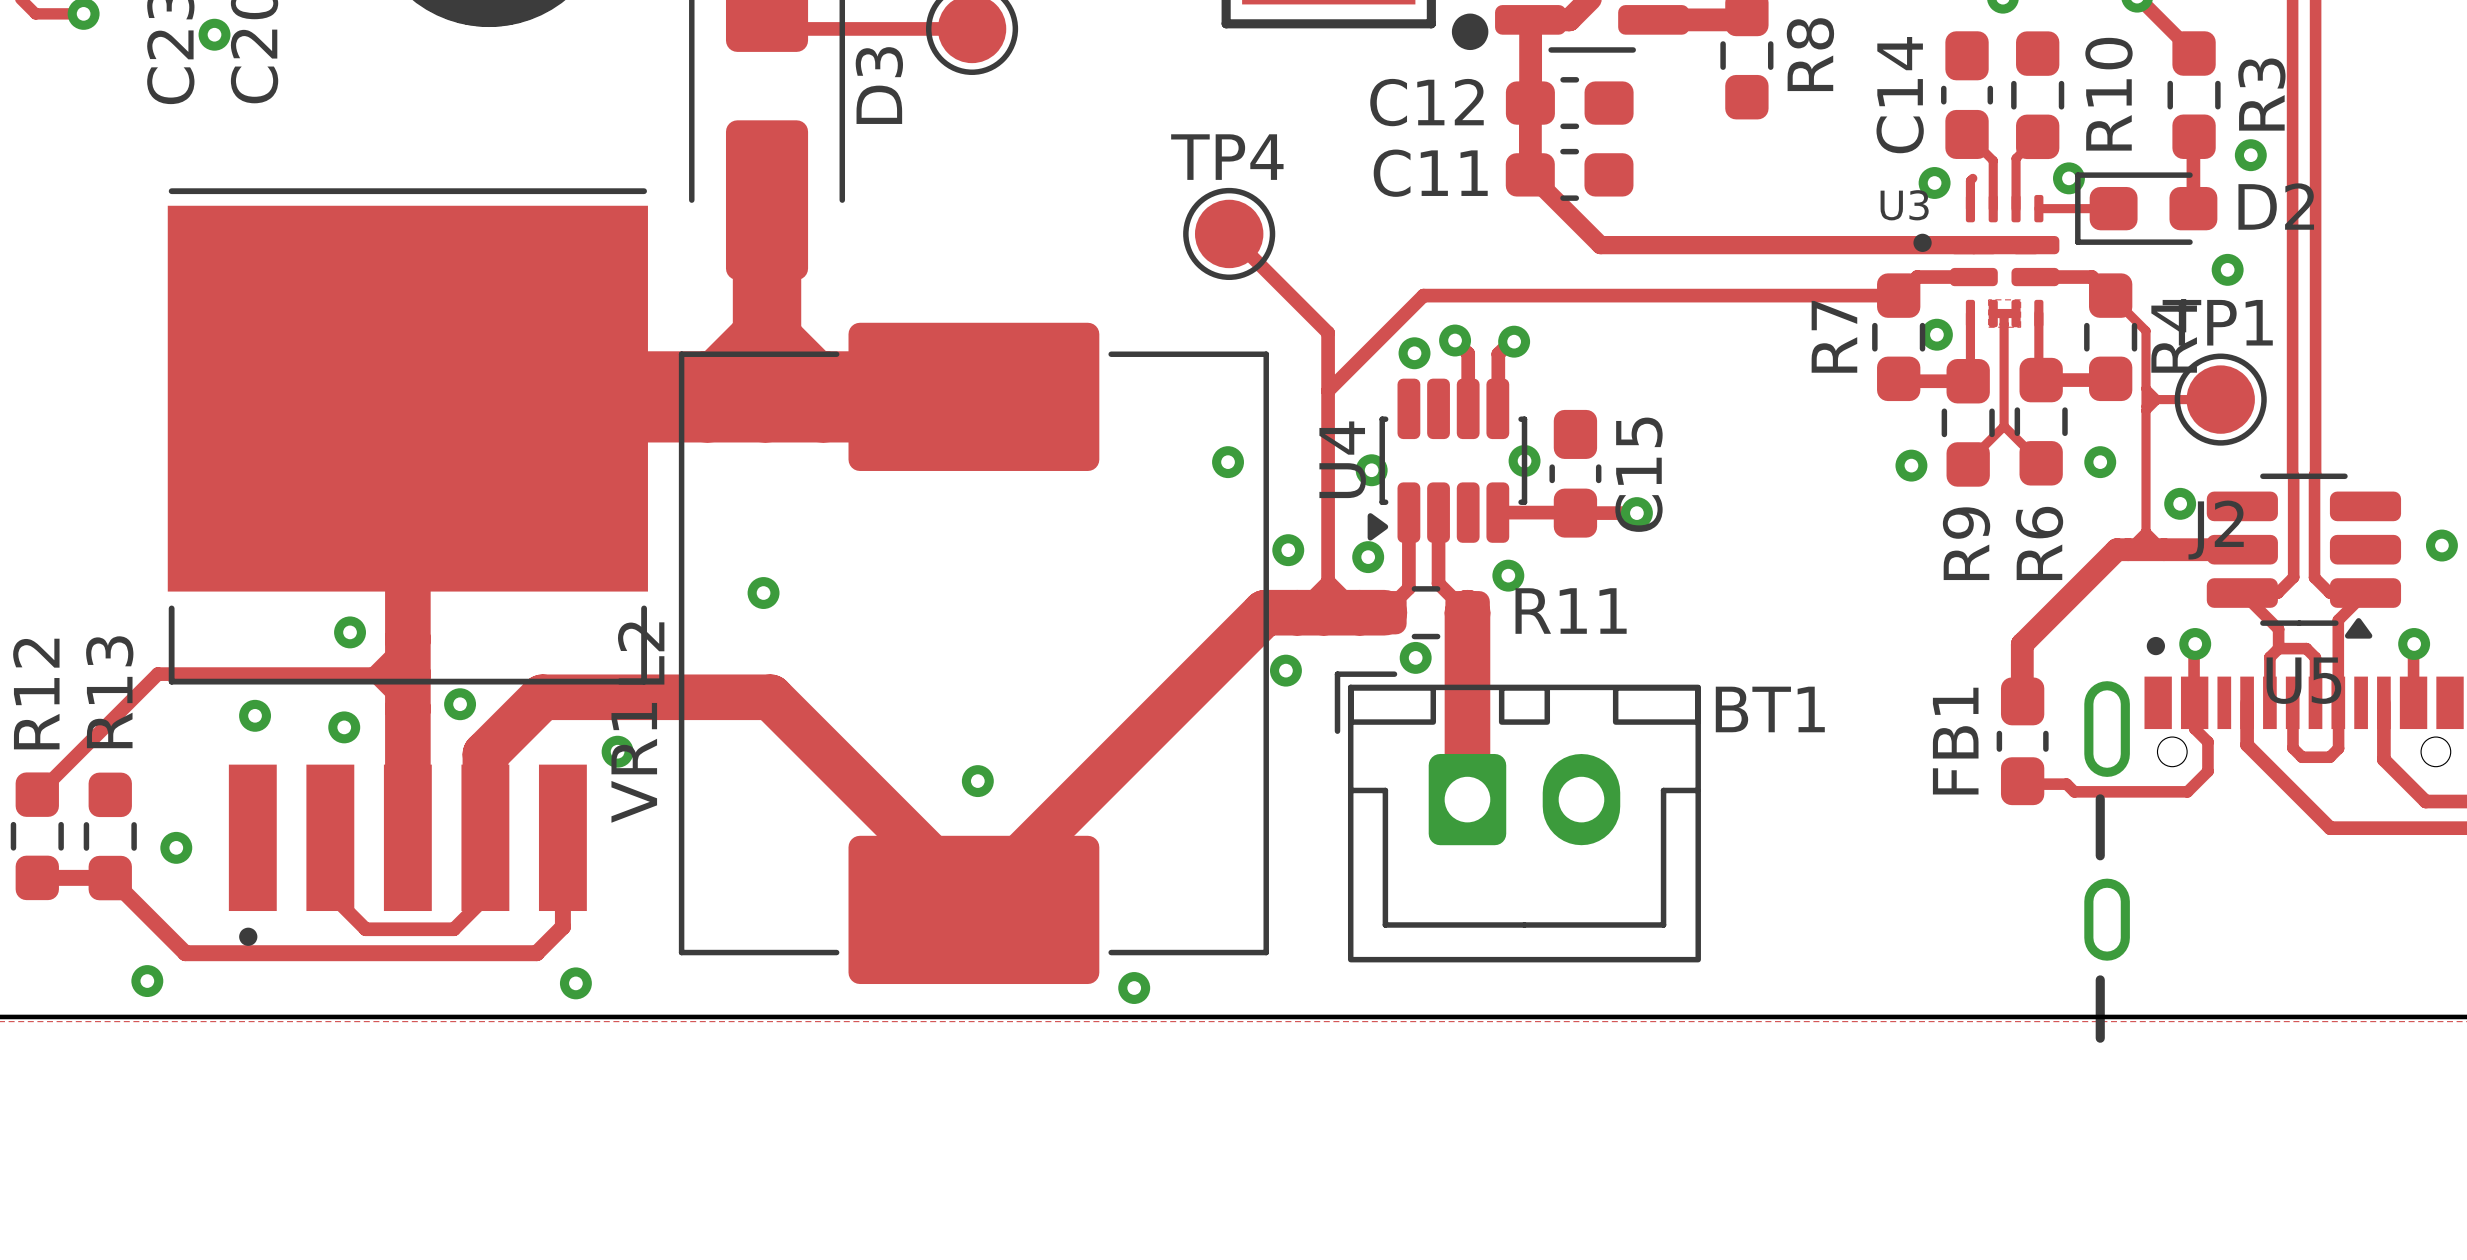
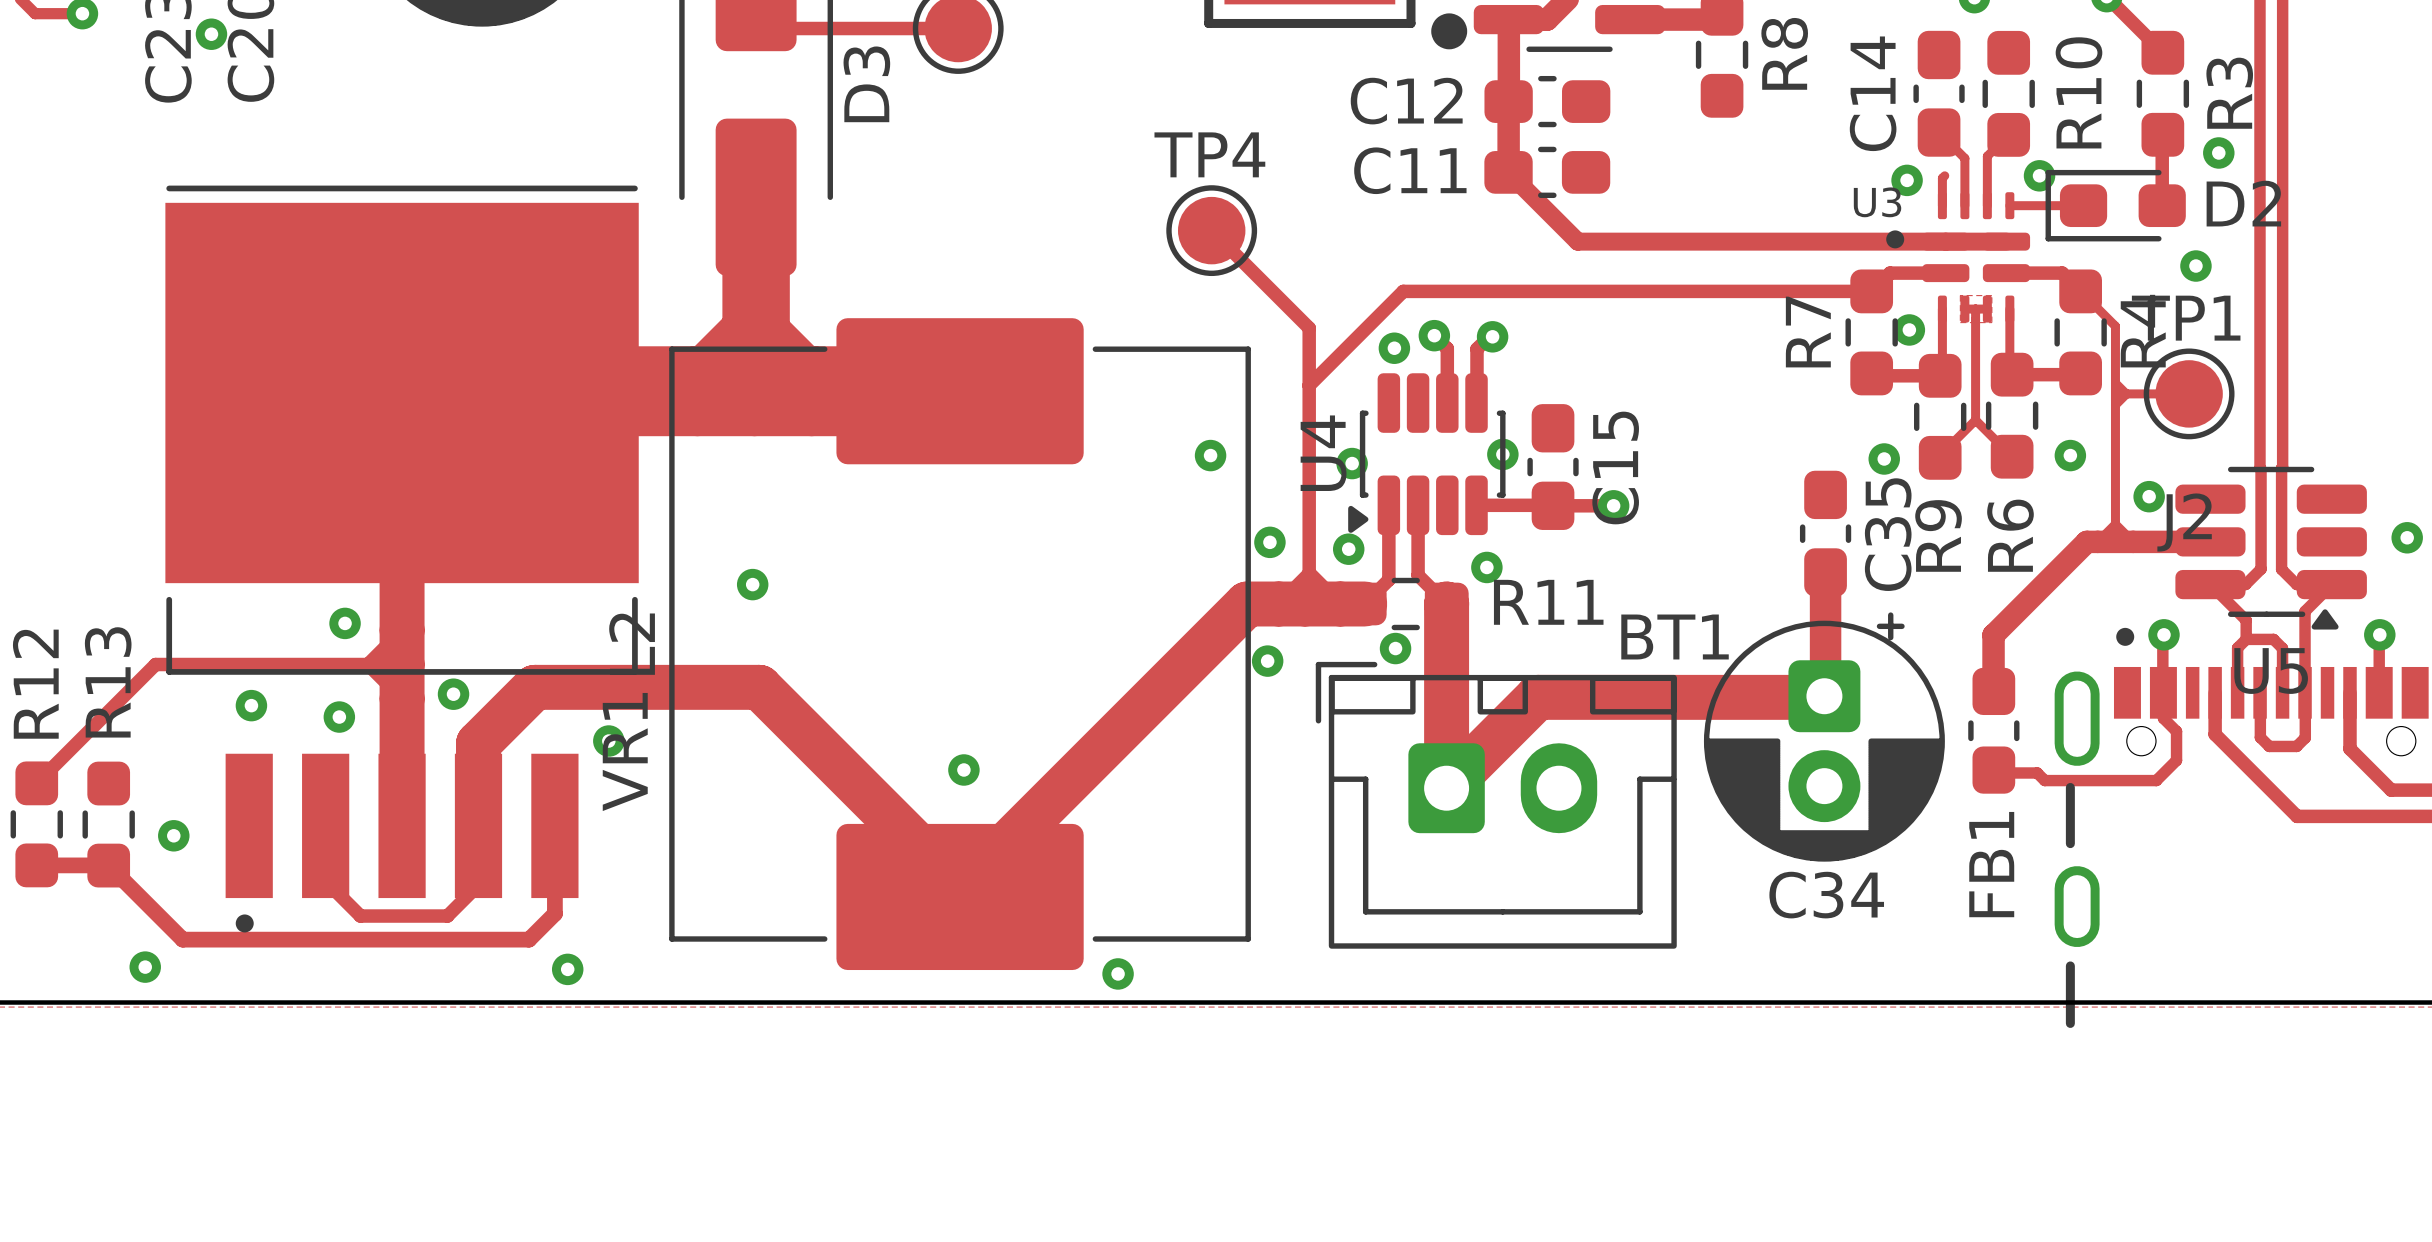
C35: none -> (1825, 533)
track: none -> (1825, 572) (1824, 696)
track: none -> (1819, 697) (1537, 697) (1446, 788)
BT1 name position: BT1 (1770, 709) -> BT1 (1675, 637)
FB1 name position: FB1 (1955, 741) -> FB1 (1991, 864)
C34: none -> (1824, 737)

